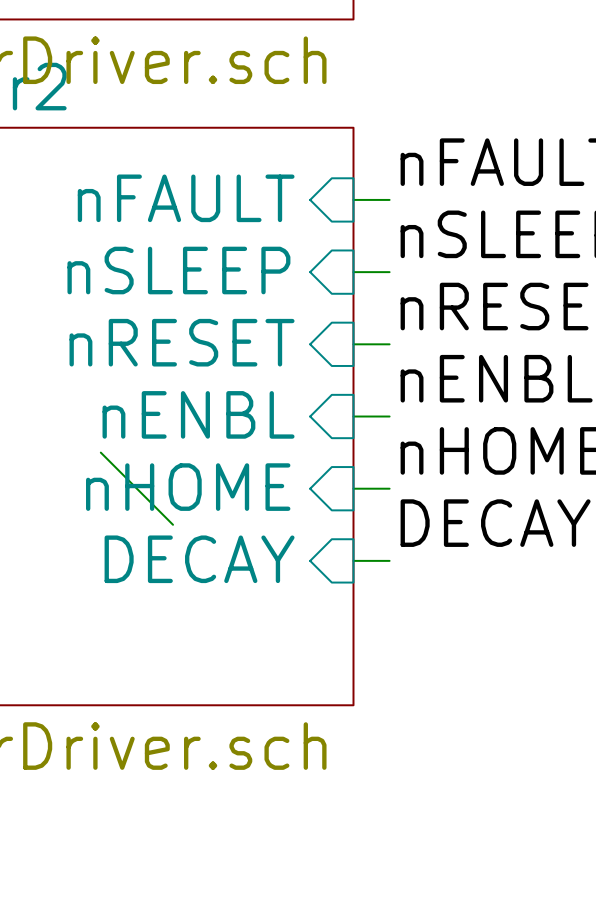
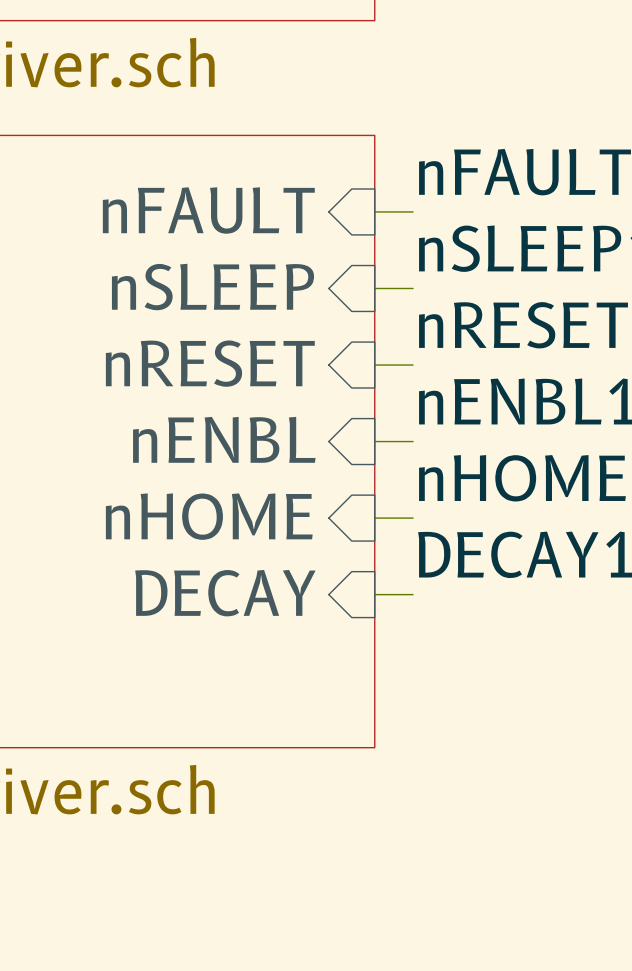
wire: (100, 452) (173, 524) -> none

